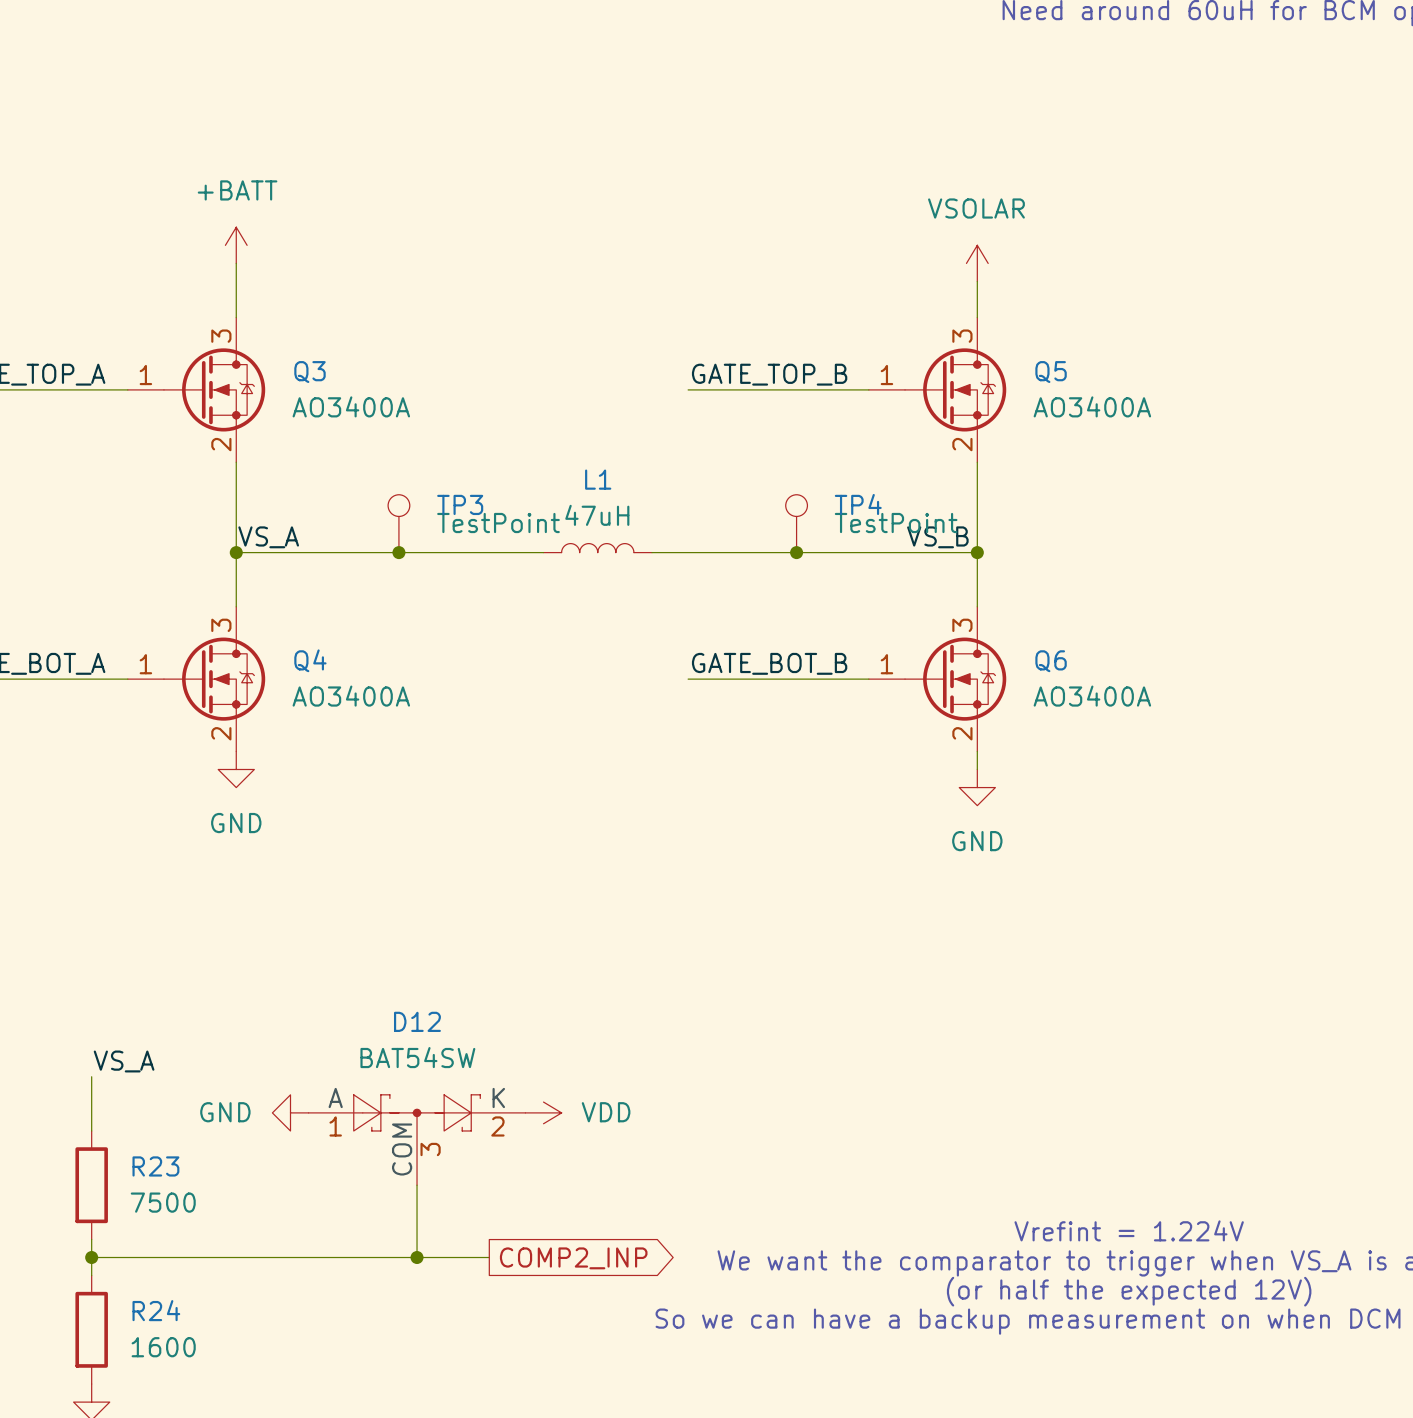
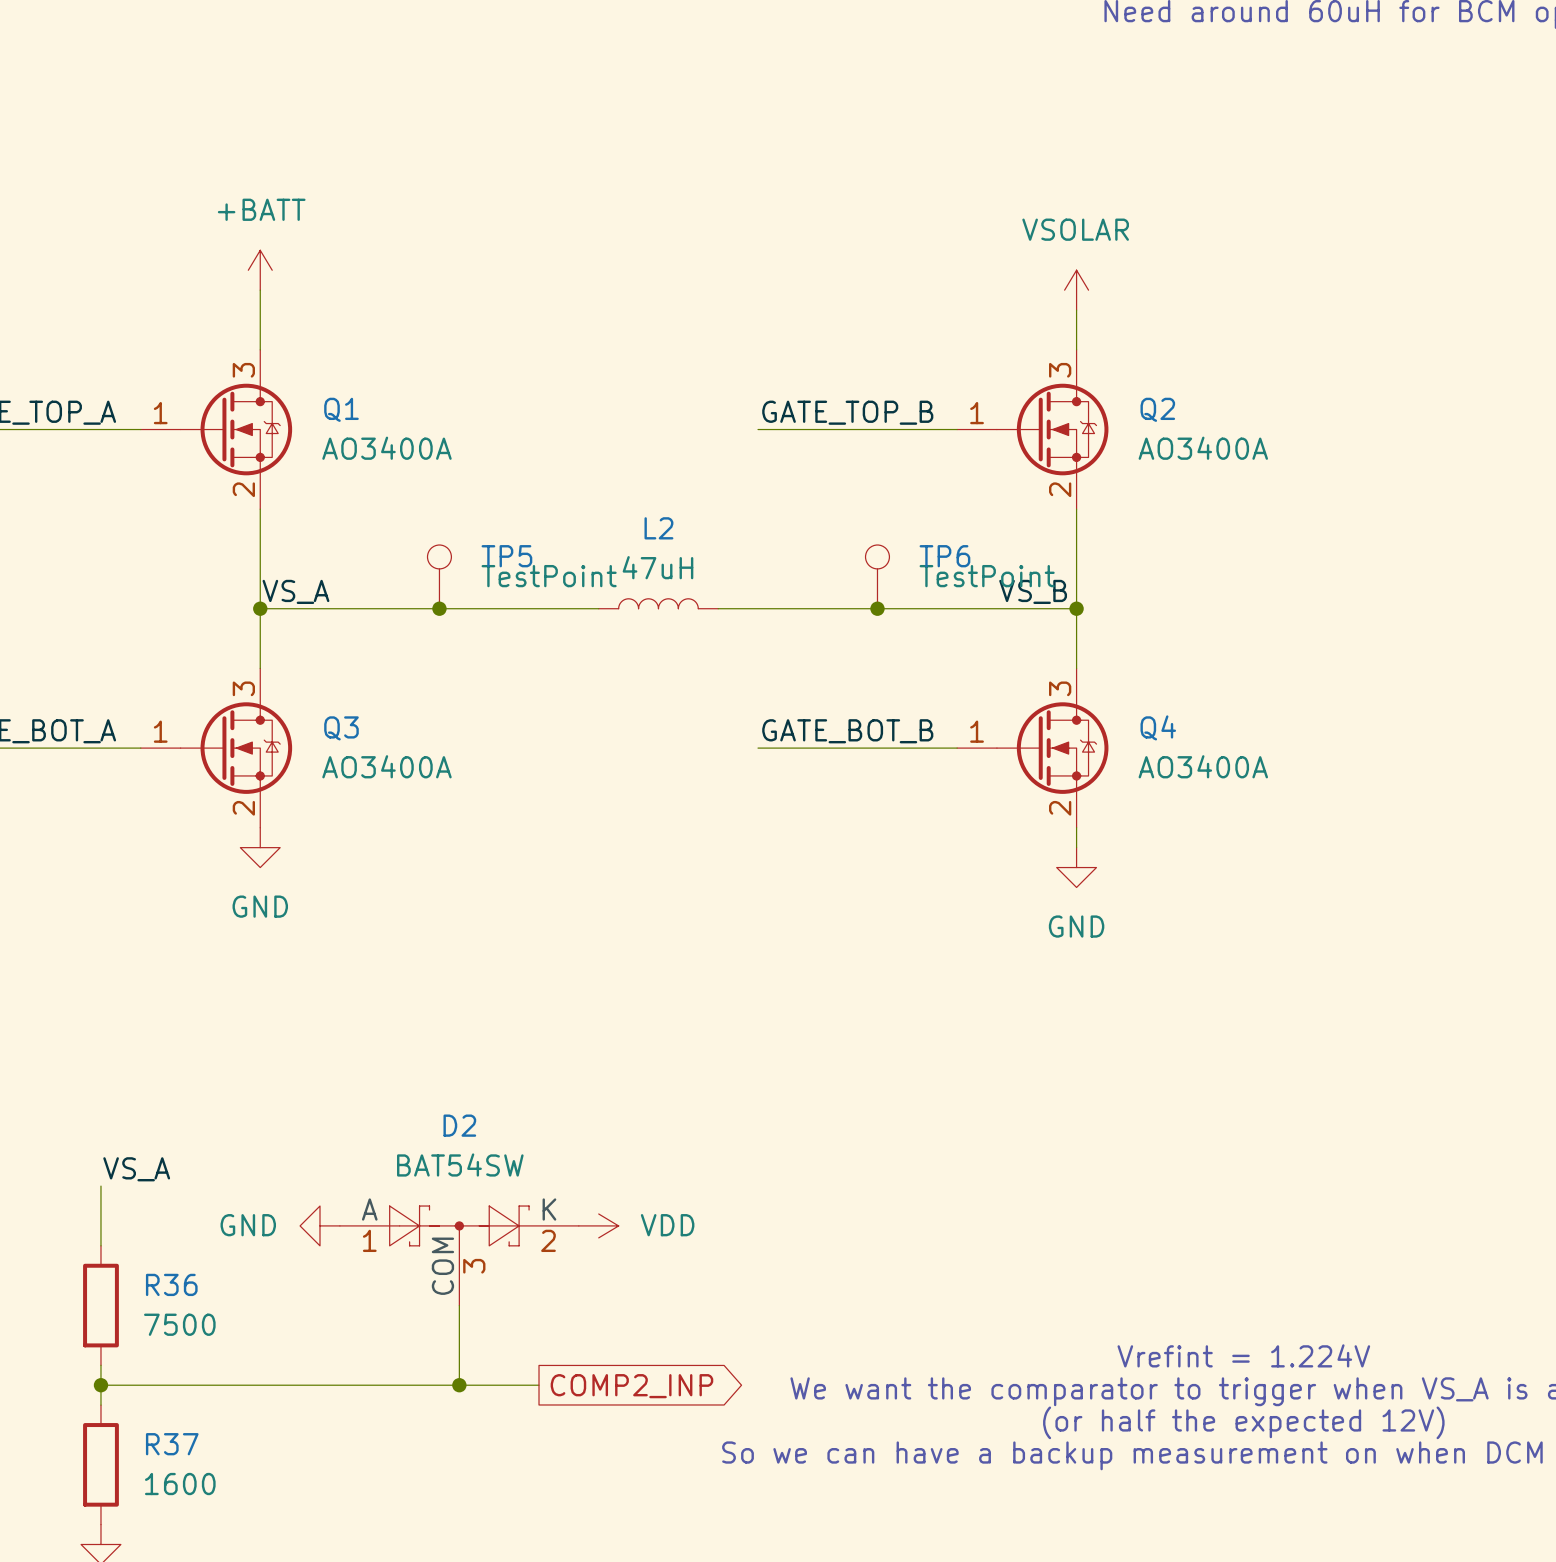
Q3 name: Q3 (309, 372) -> Q1 (341, 409)
Q5 name: Q5 (1051, 372) -> Q2 (1157, 409)
L1 name: L1 (598, 479) -> L2 (658, 528)
TP3 name: TP3 (460, 504) -> TP5 (506, 556)
TP4 name: TP4 (858, 504) -> TP6 (944, 556)
Q4 name: Q4 (310, 660) -> Q3 (341, 728)
Q6 name: Q6 (1051, 661) -> Q4 (1158, 727)
D12 name: D12 (417, 1021) -> D2 (459, 1125)
R23 name: R23 (155, 1166) -> R36 (171, 1284)
R24 name: R24 (156, 1310) -> R37 (172, 1444)

